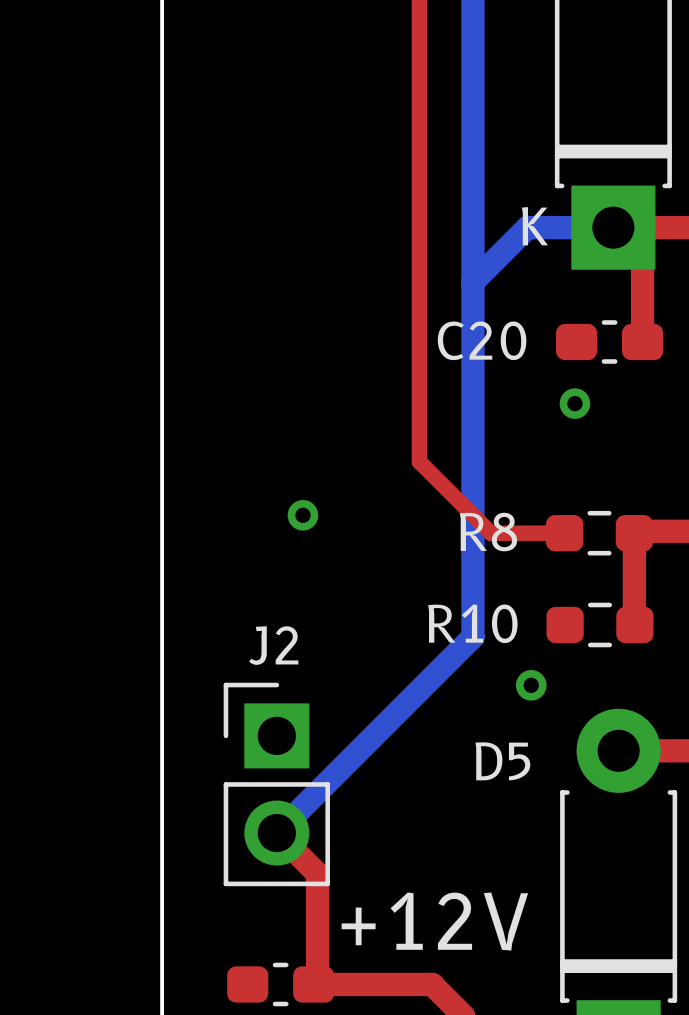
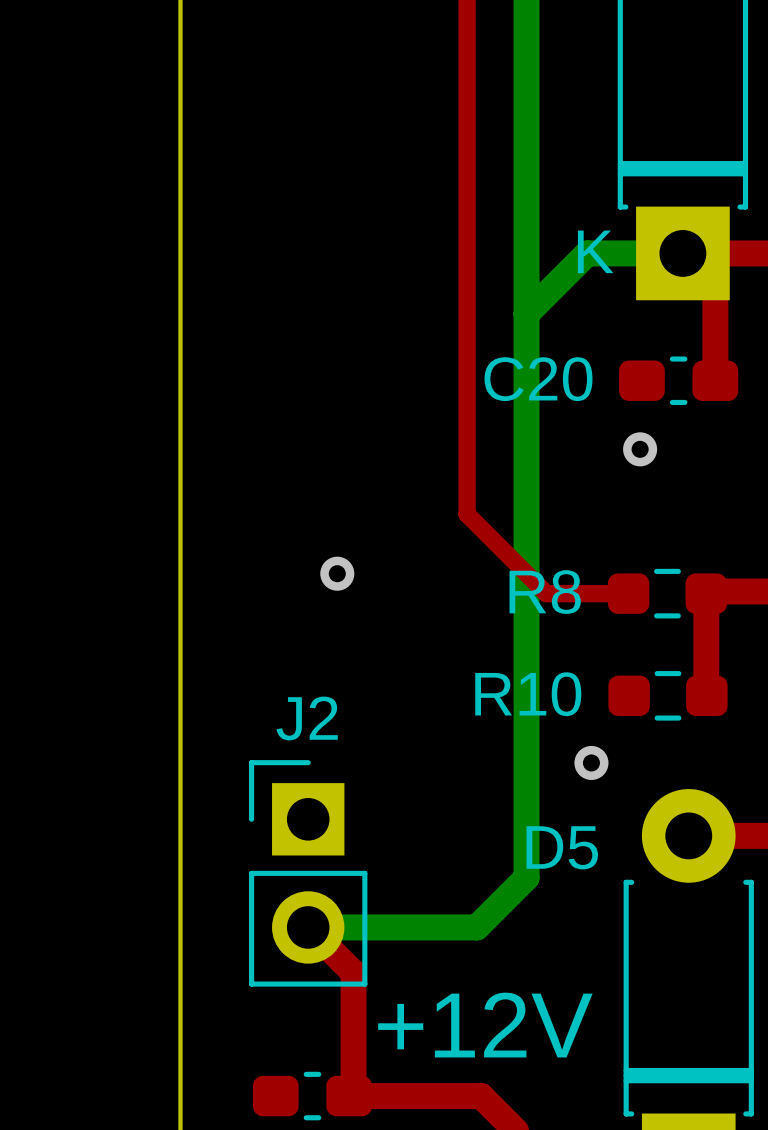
bottom track: (472, 636) (276, 833) -> (526, 709) (526, 877) (476, 927) (308, 927)

